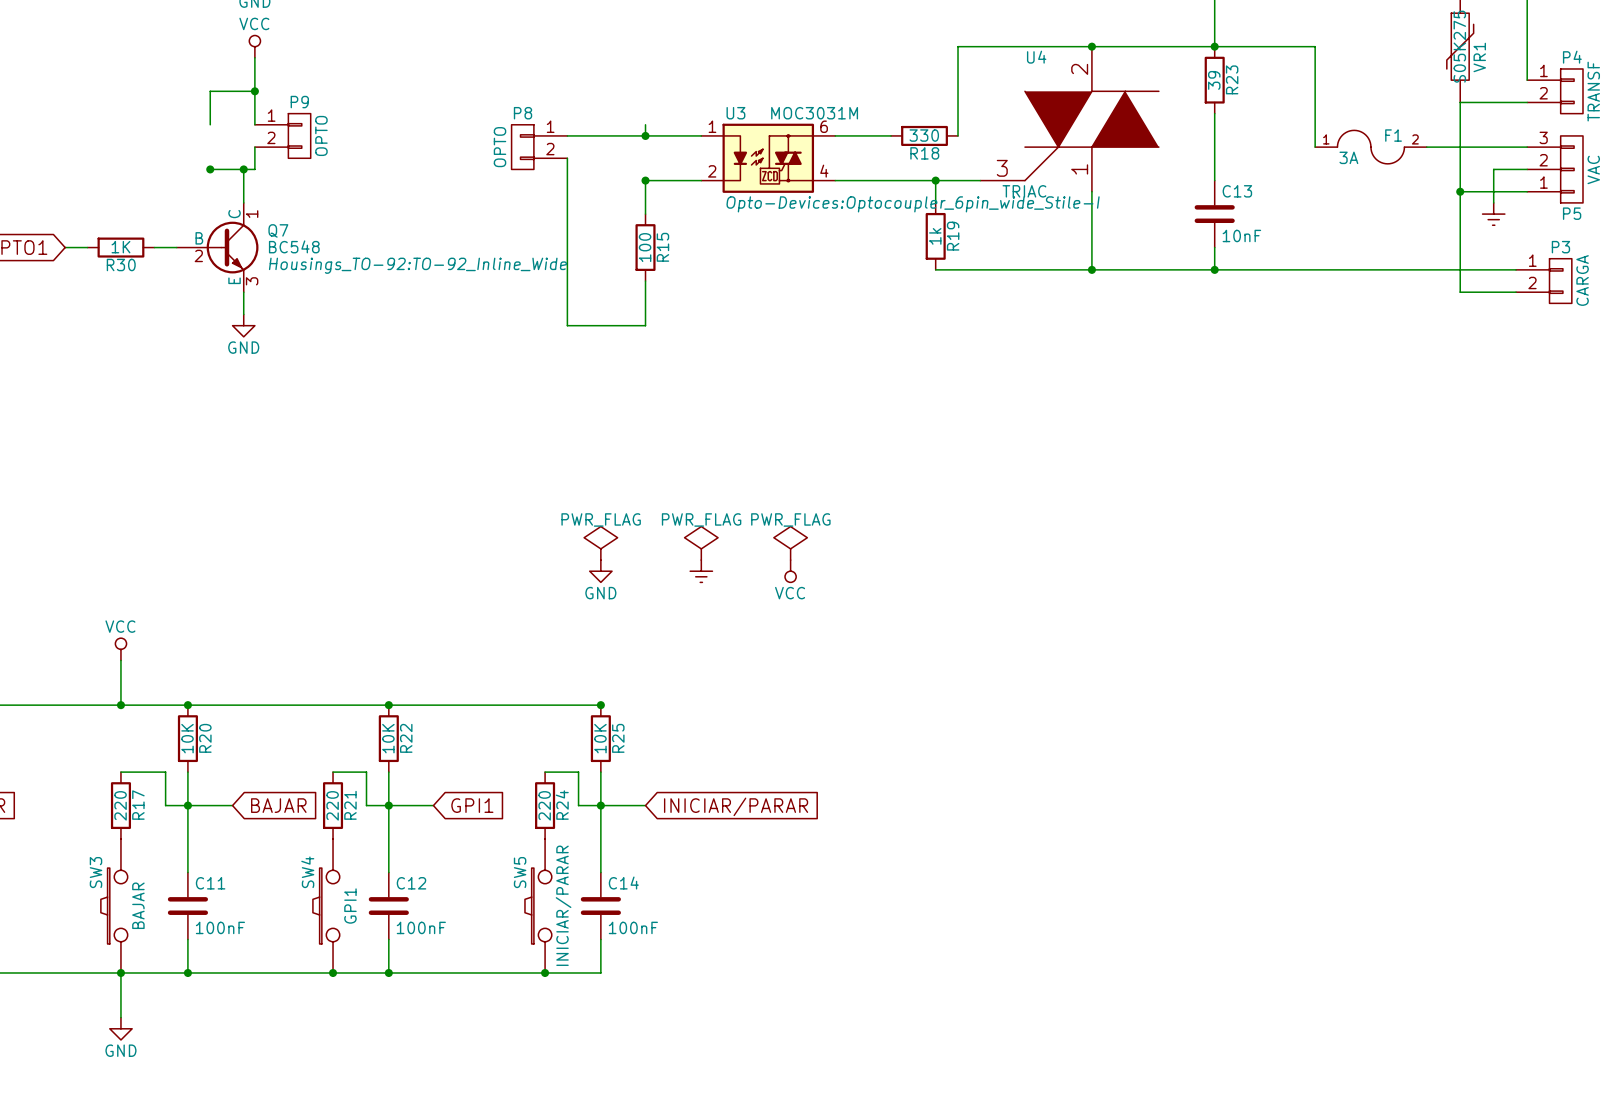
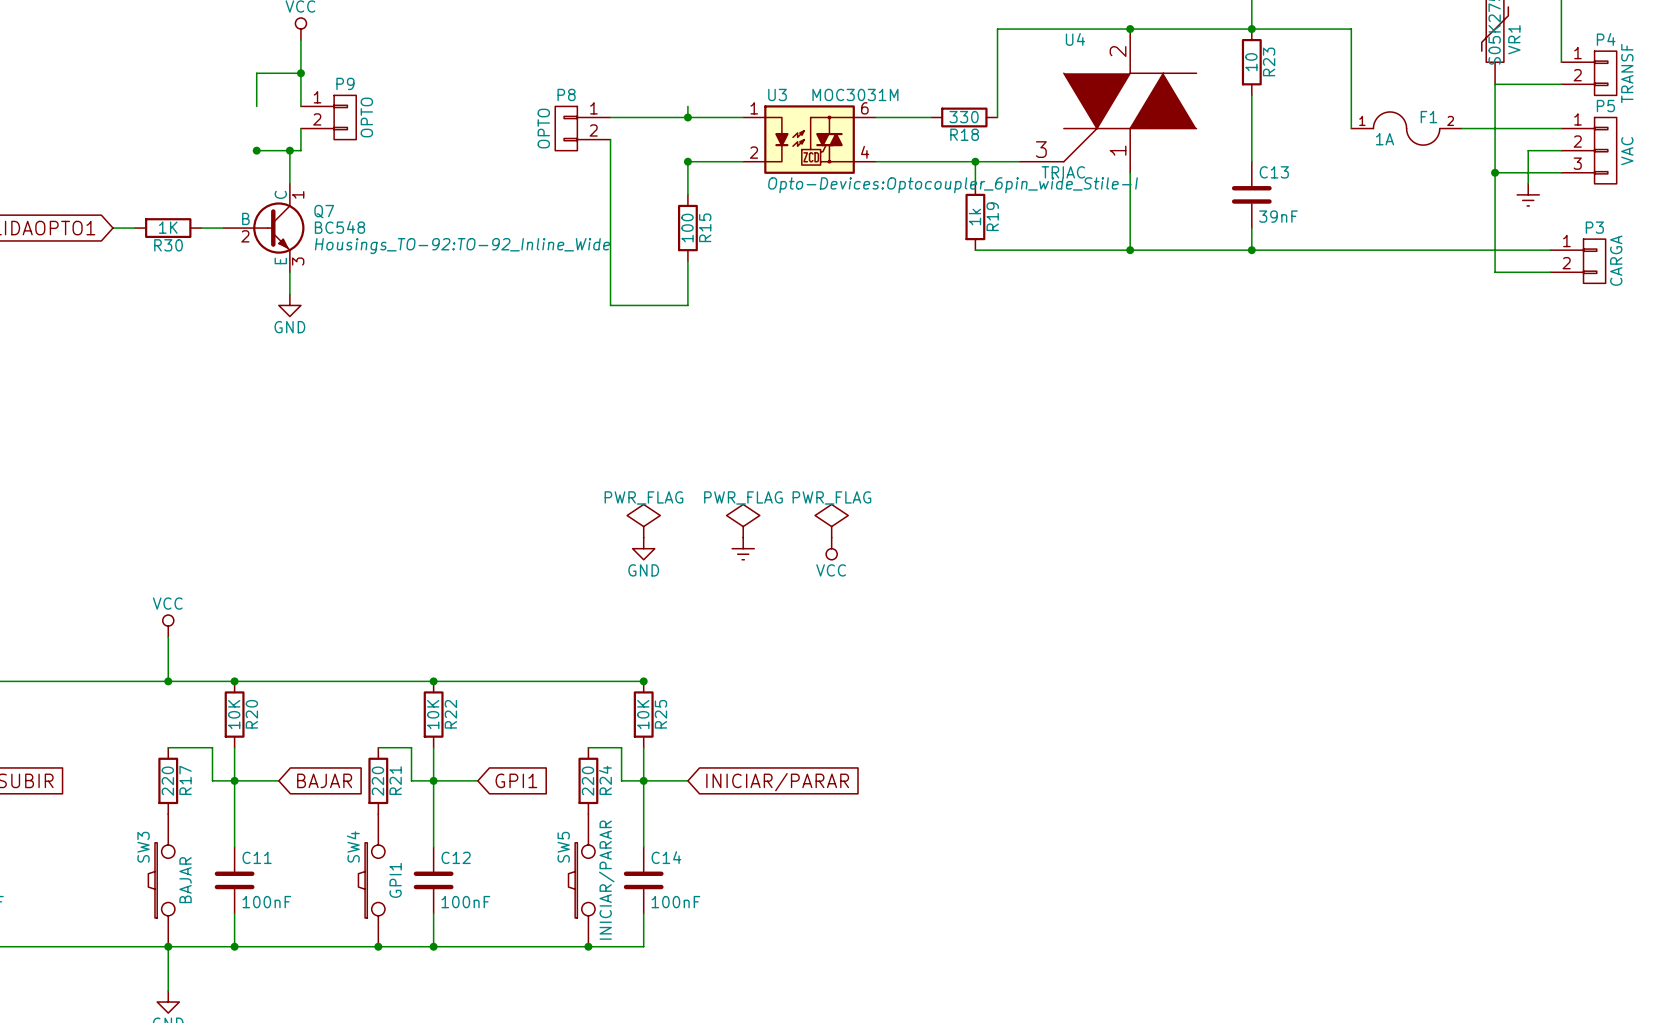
R23 value: 39 (1214, 80) -> 10 (1251, 62)
F1 value: 3A (1348, 157) -> 1A (1385, 139)
P5 flip: as is (1571, 169) -> up-down (1605, 150)
C13 value: 10nF (1241, 235) -> 39nF (1278, 216)

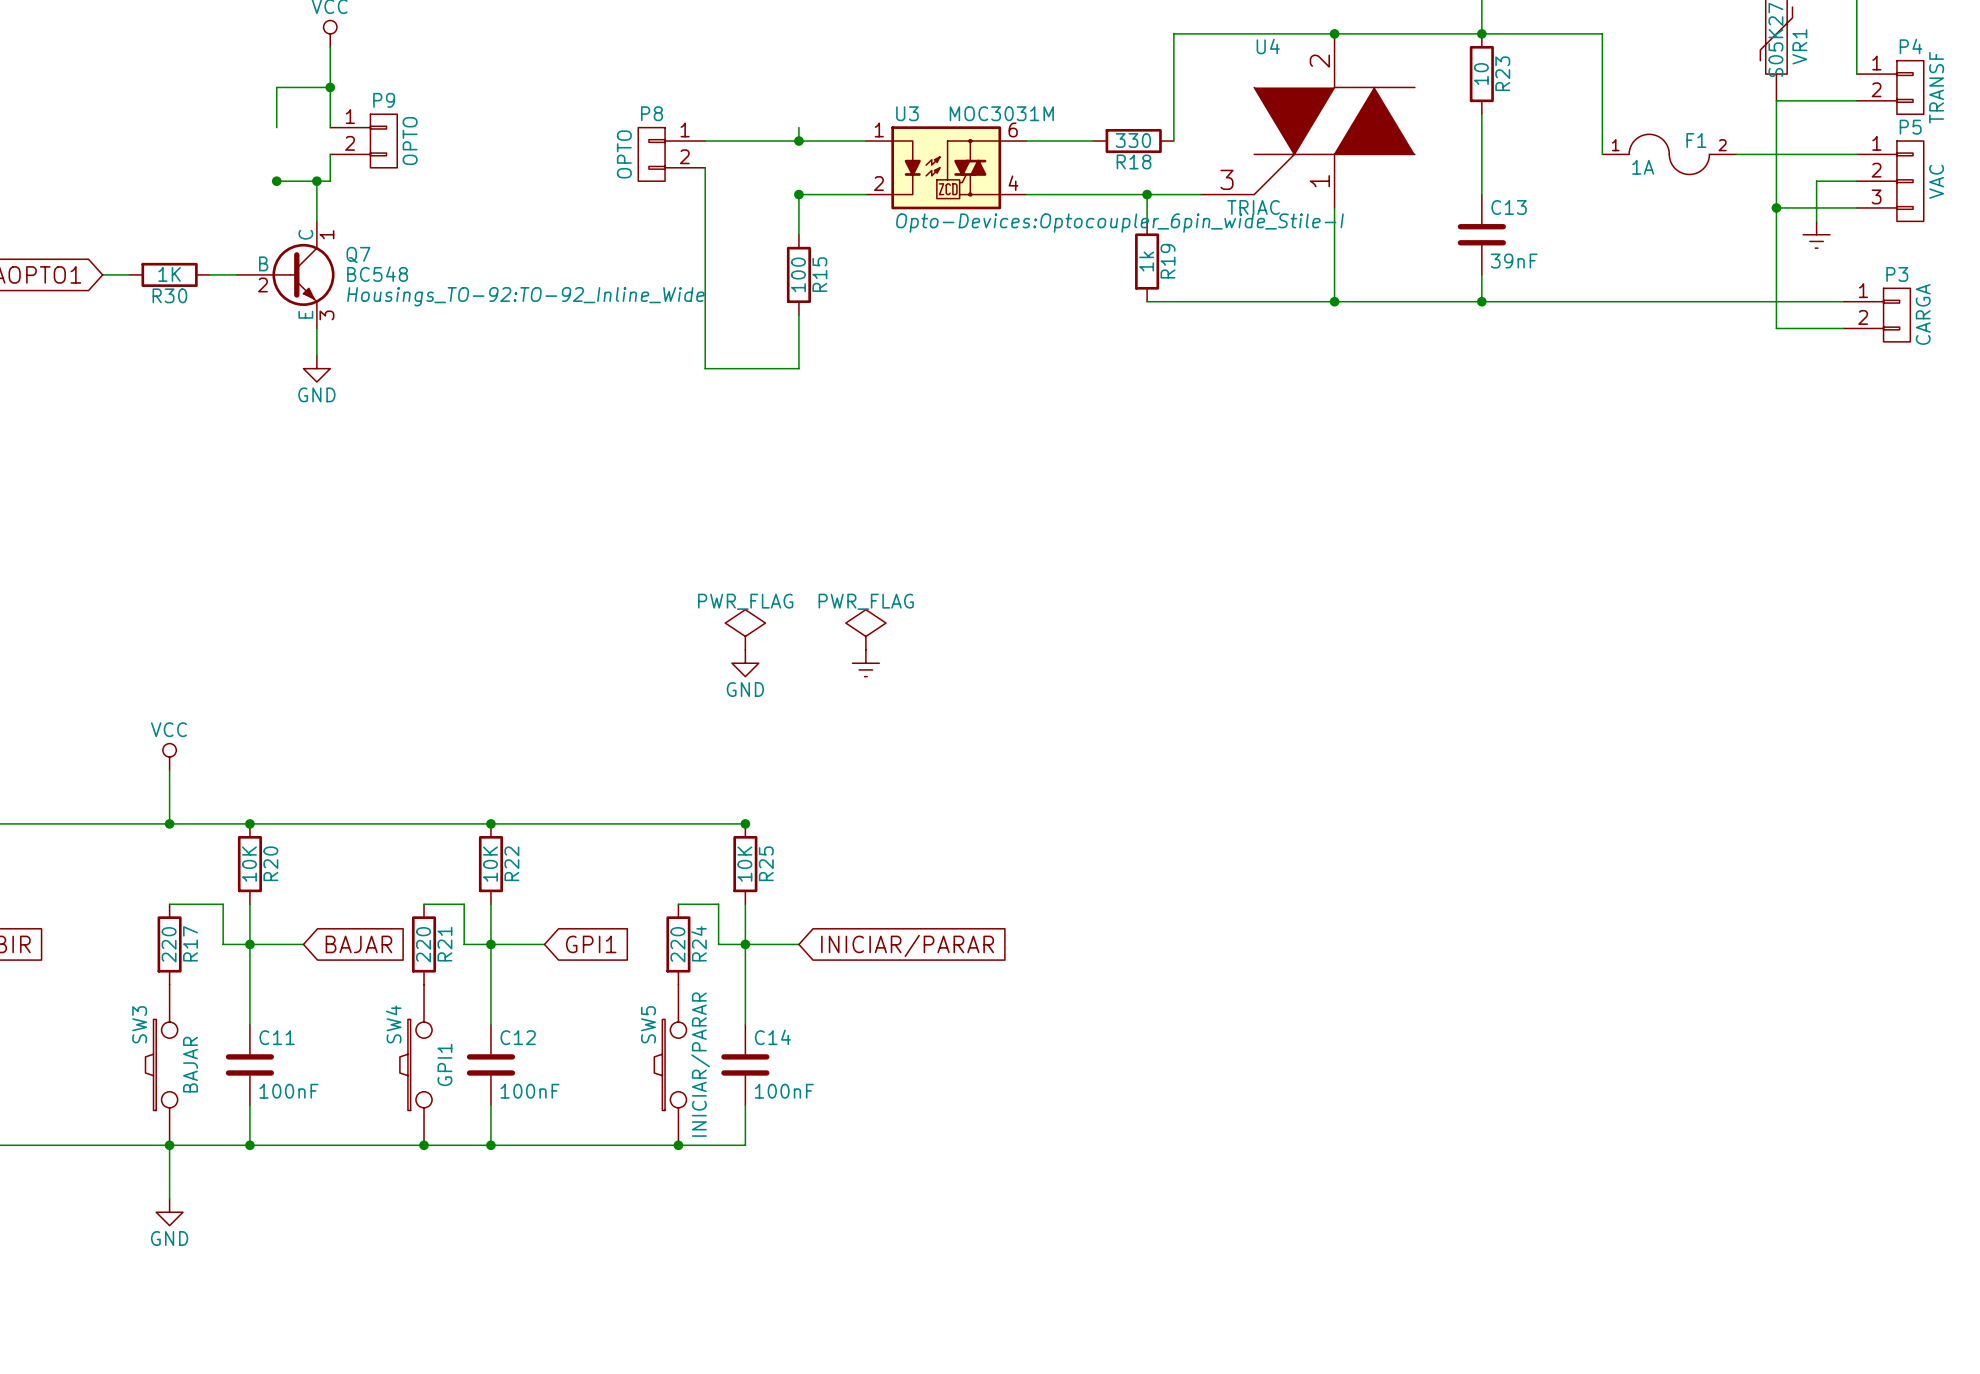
power symbol: PWR_FLAG (831, 521) -> none
power symbol: VCC (831, 548) -> none

